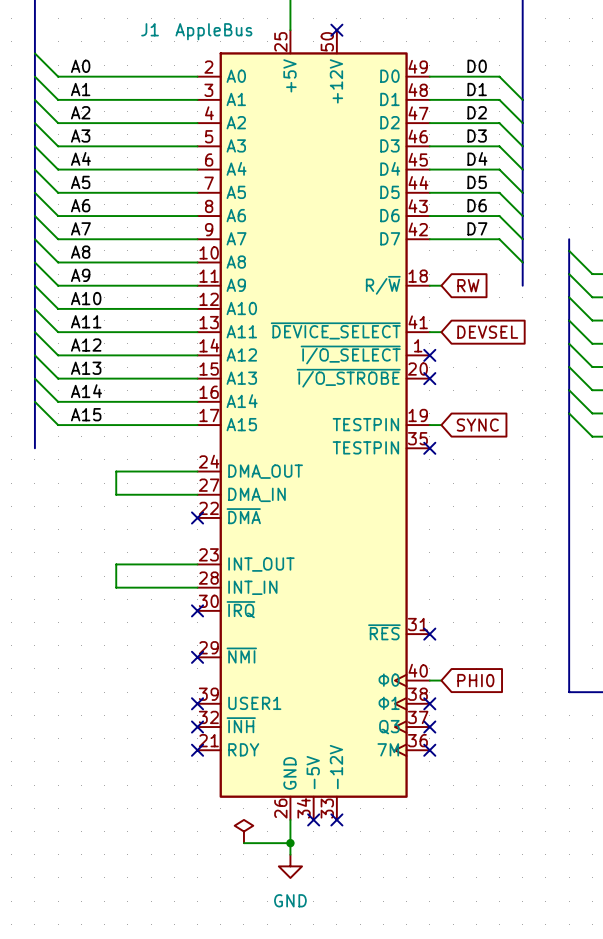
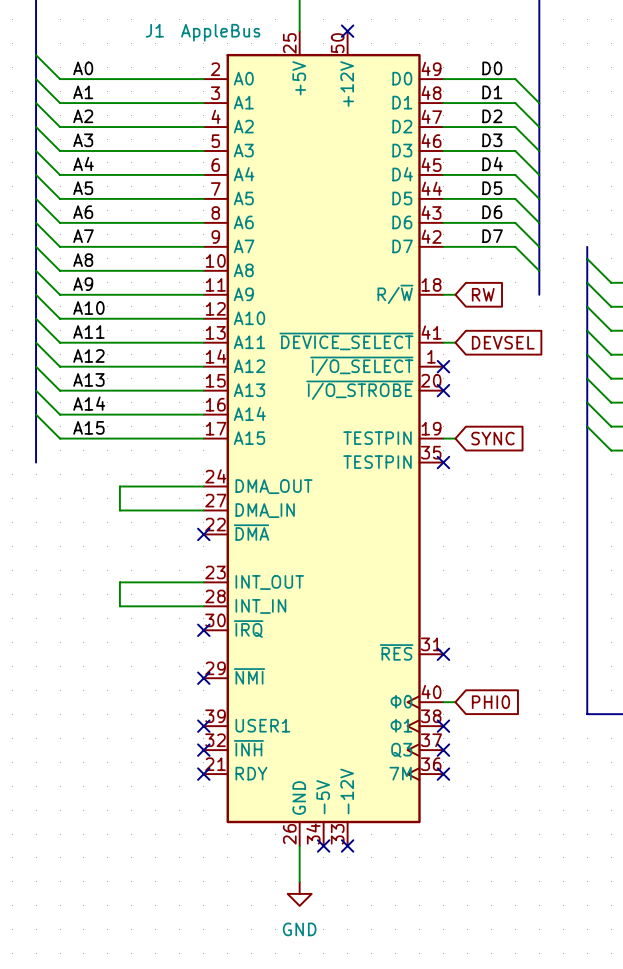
power symbol: (243, 831) -> none
wire: (243, 843) (290, 843) -> none
junction: (290, 843) -> none

